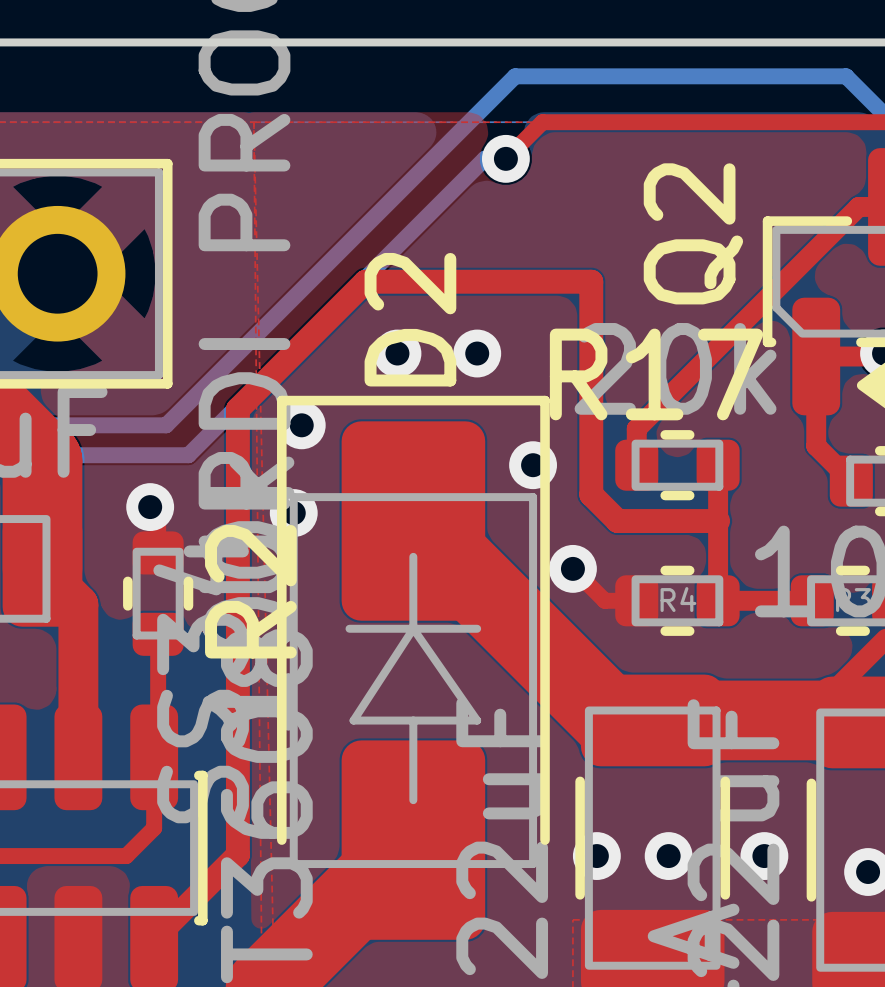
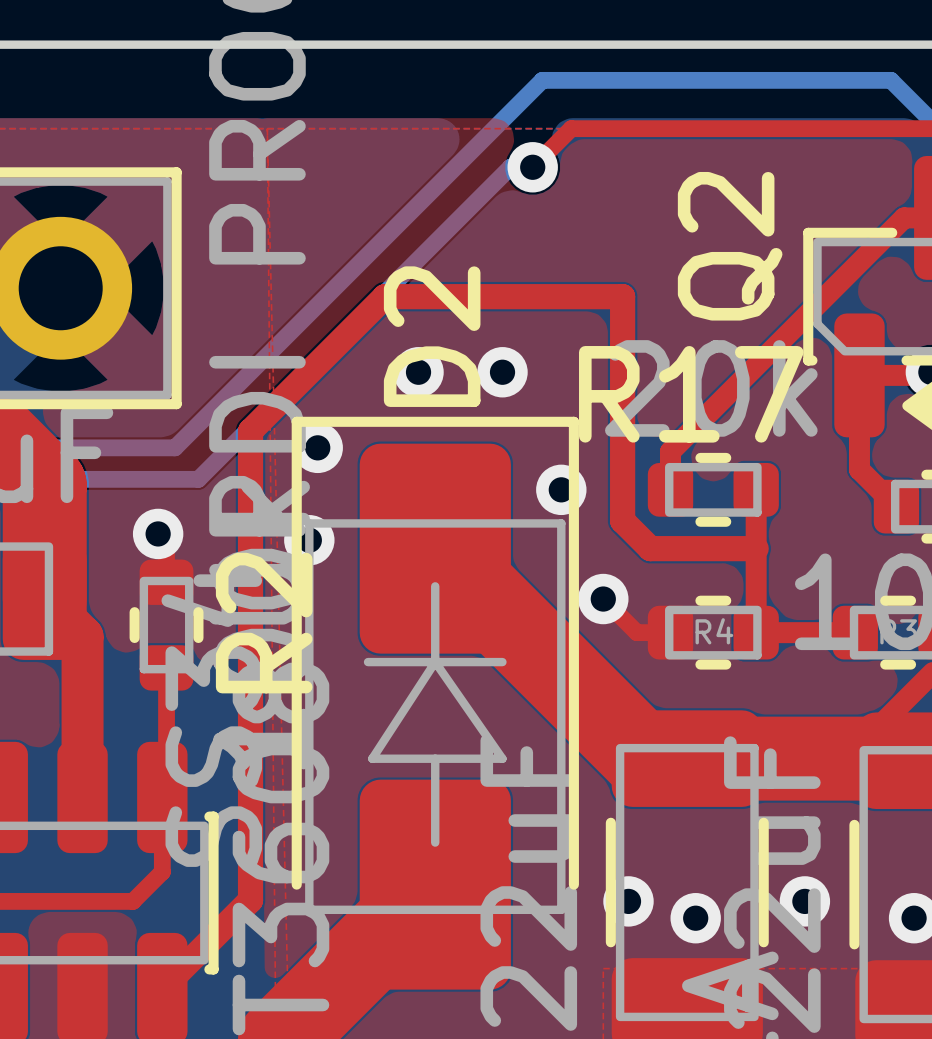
via position: (668, 856) -> (695, 918)

